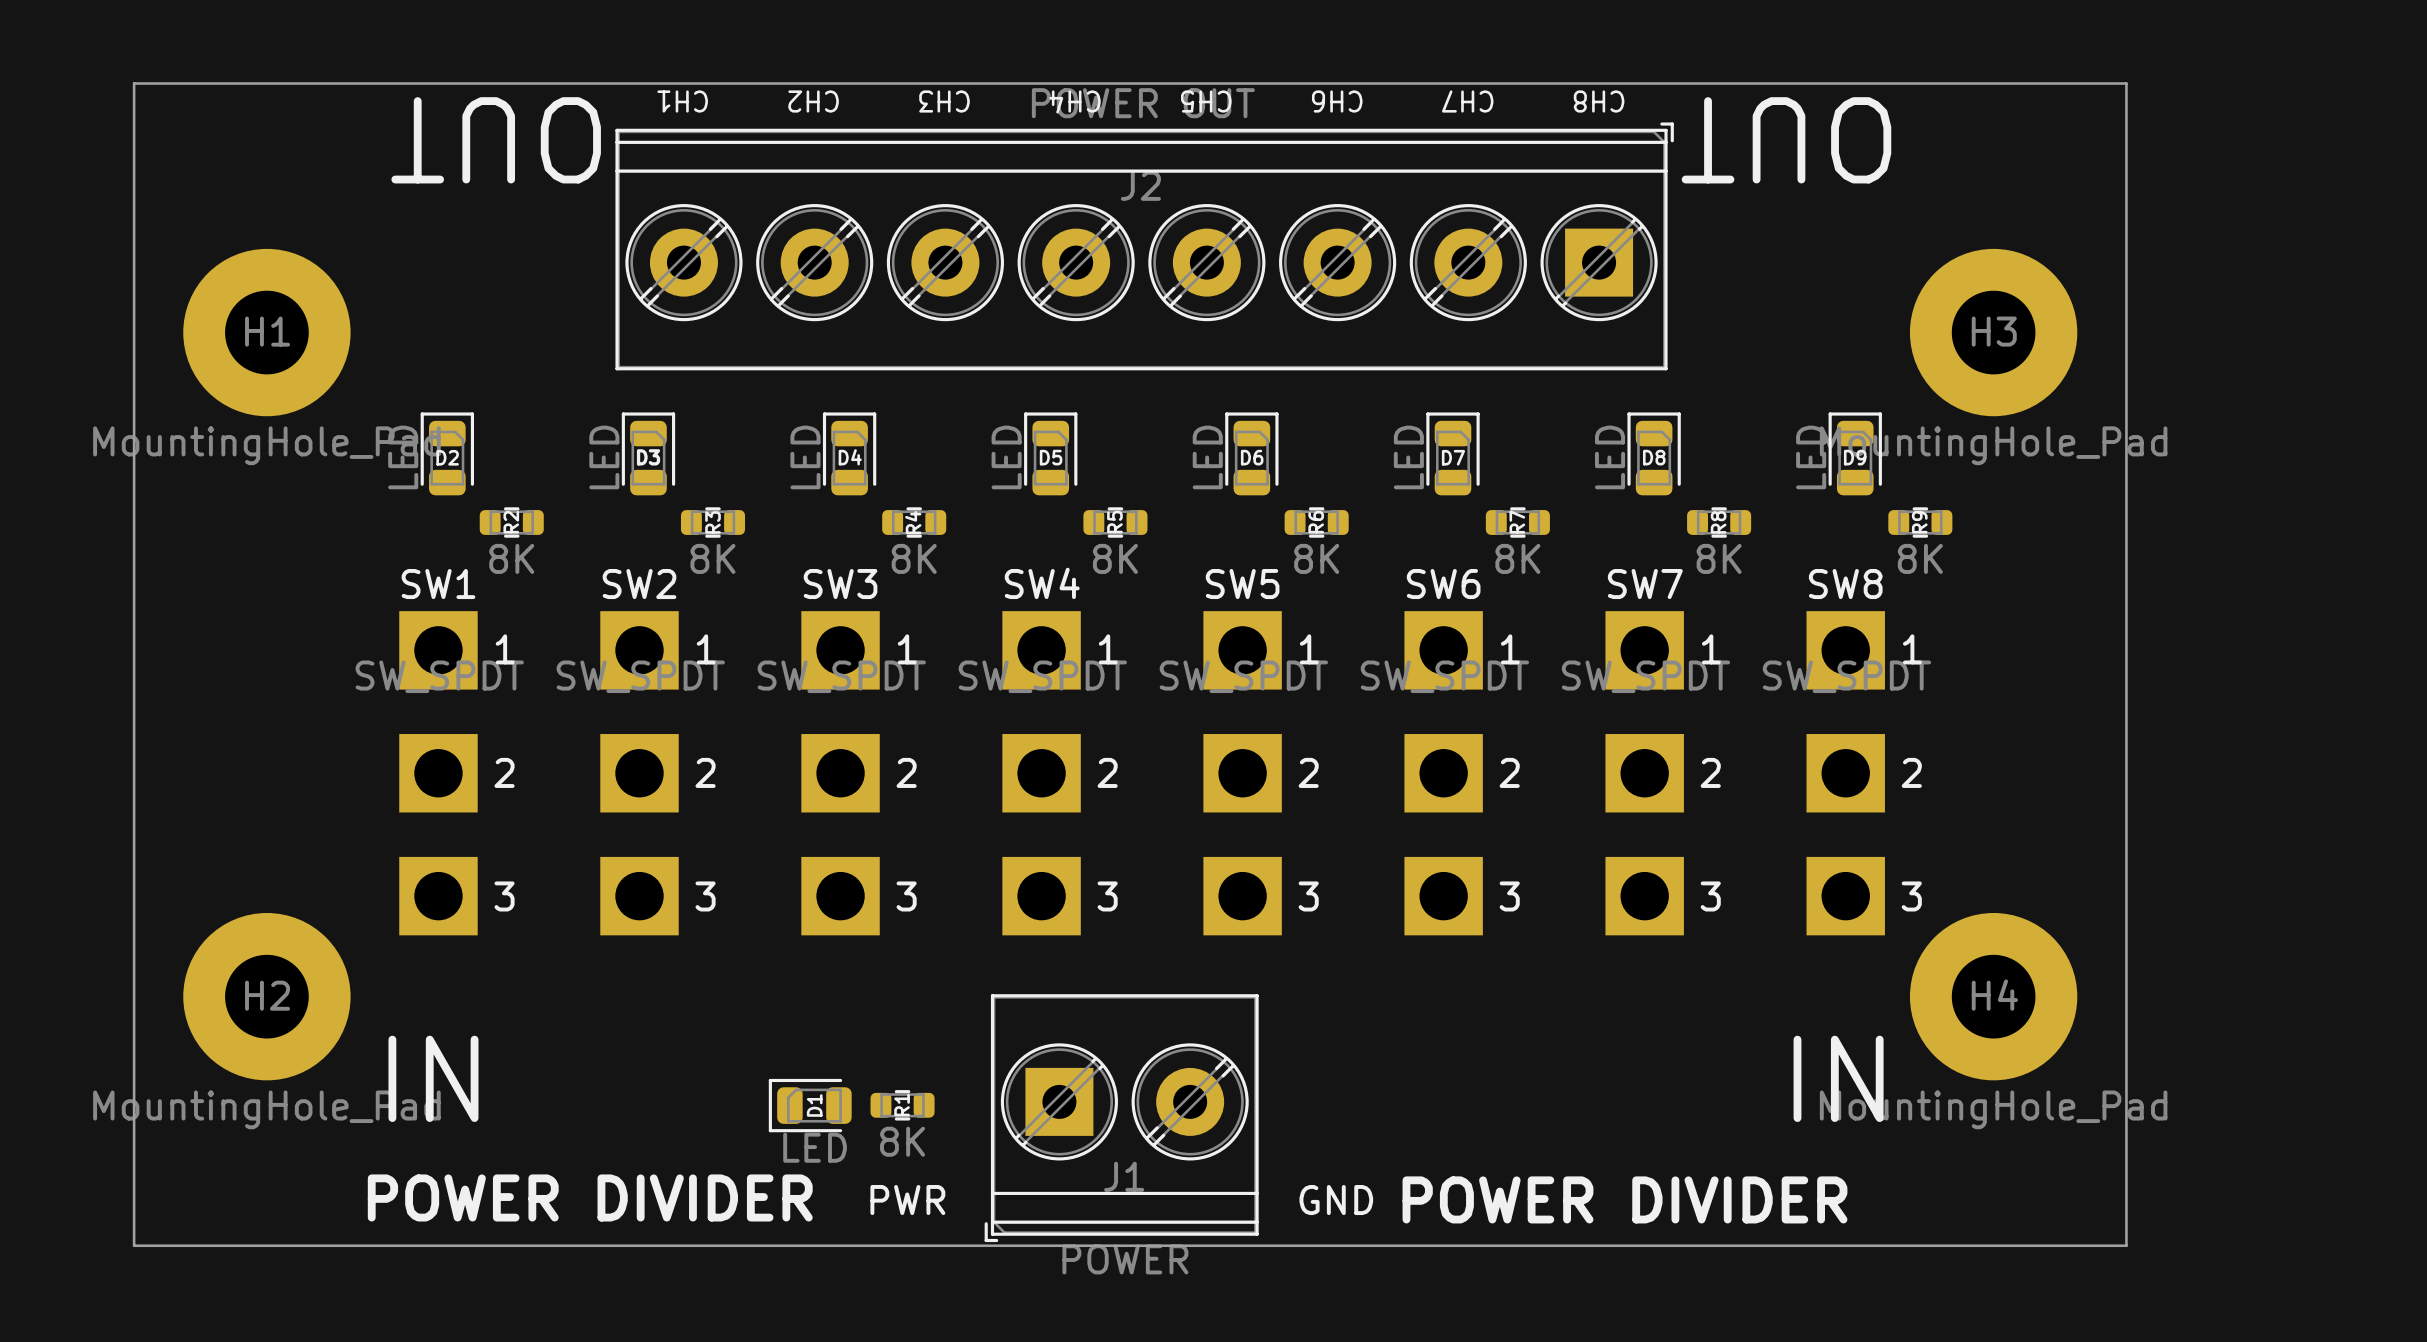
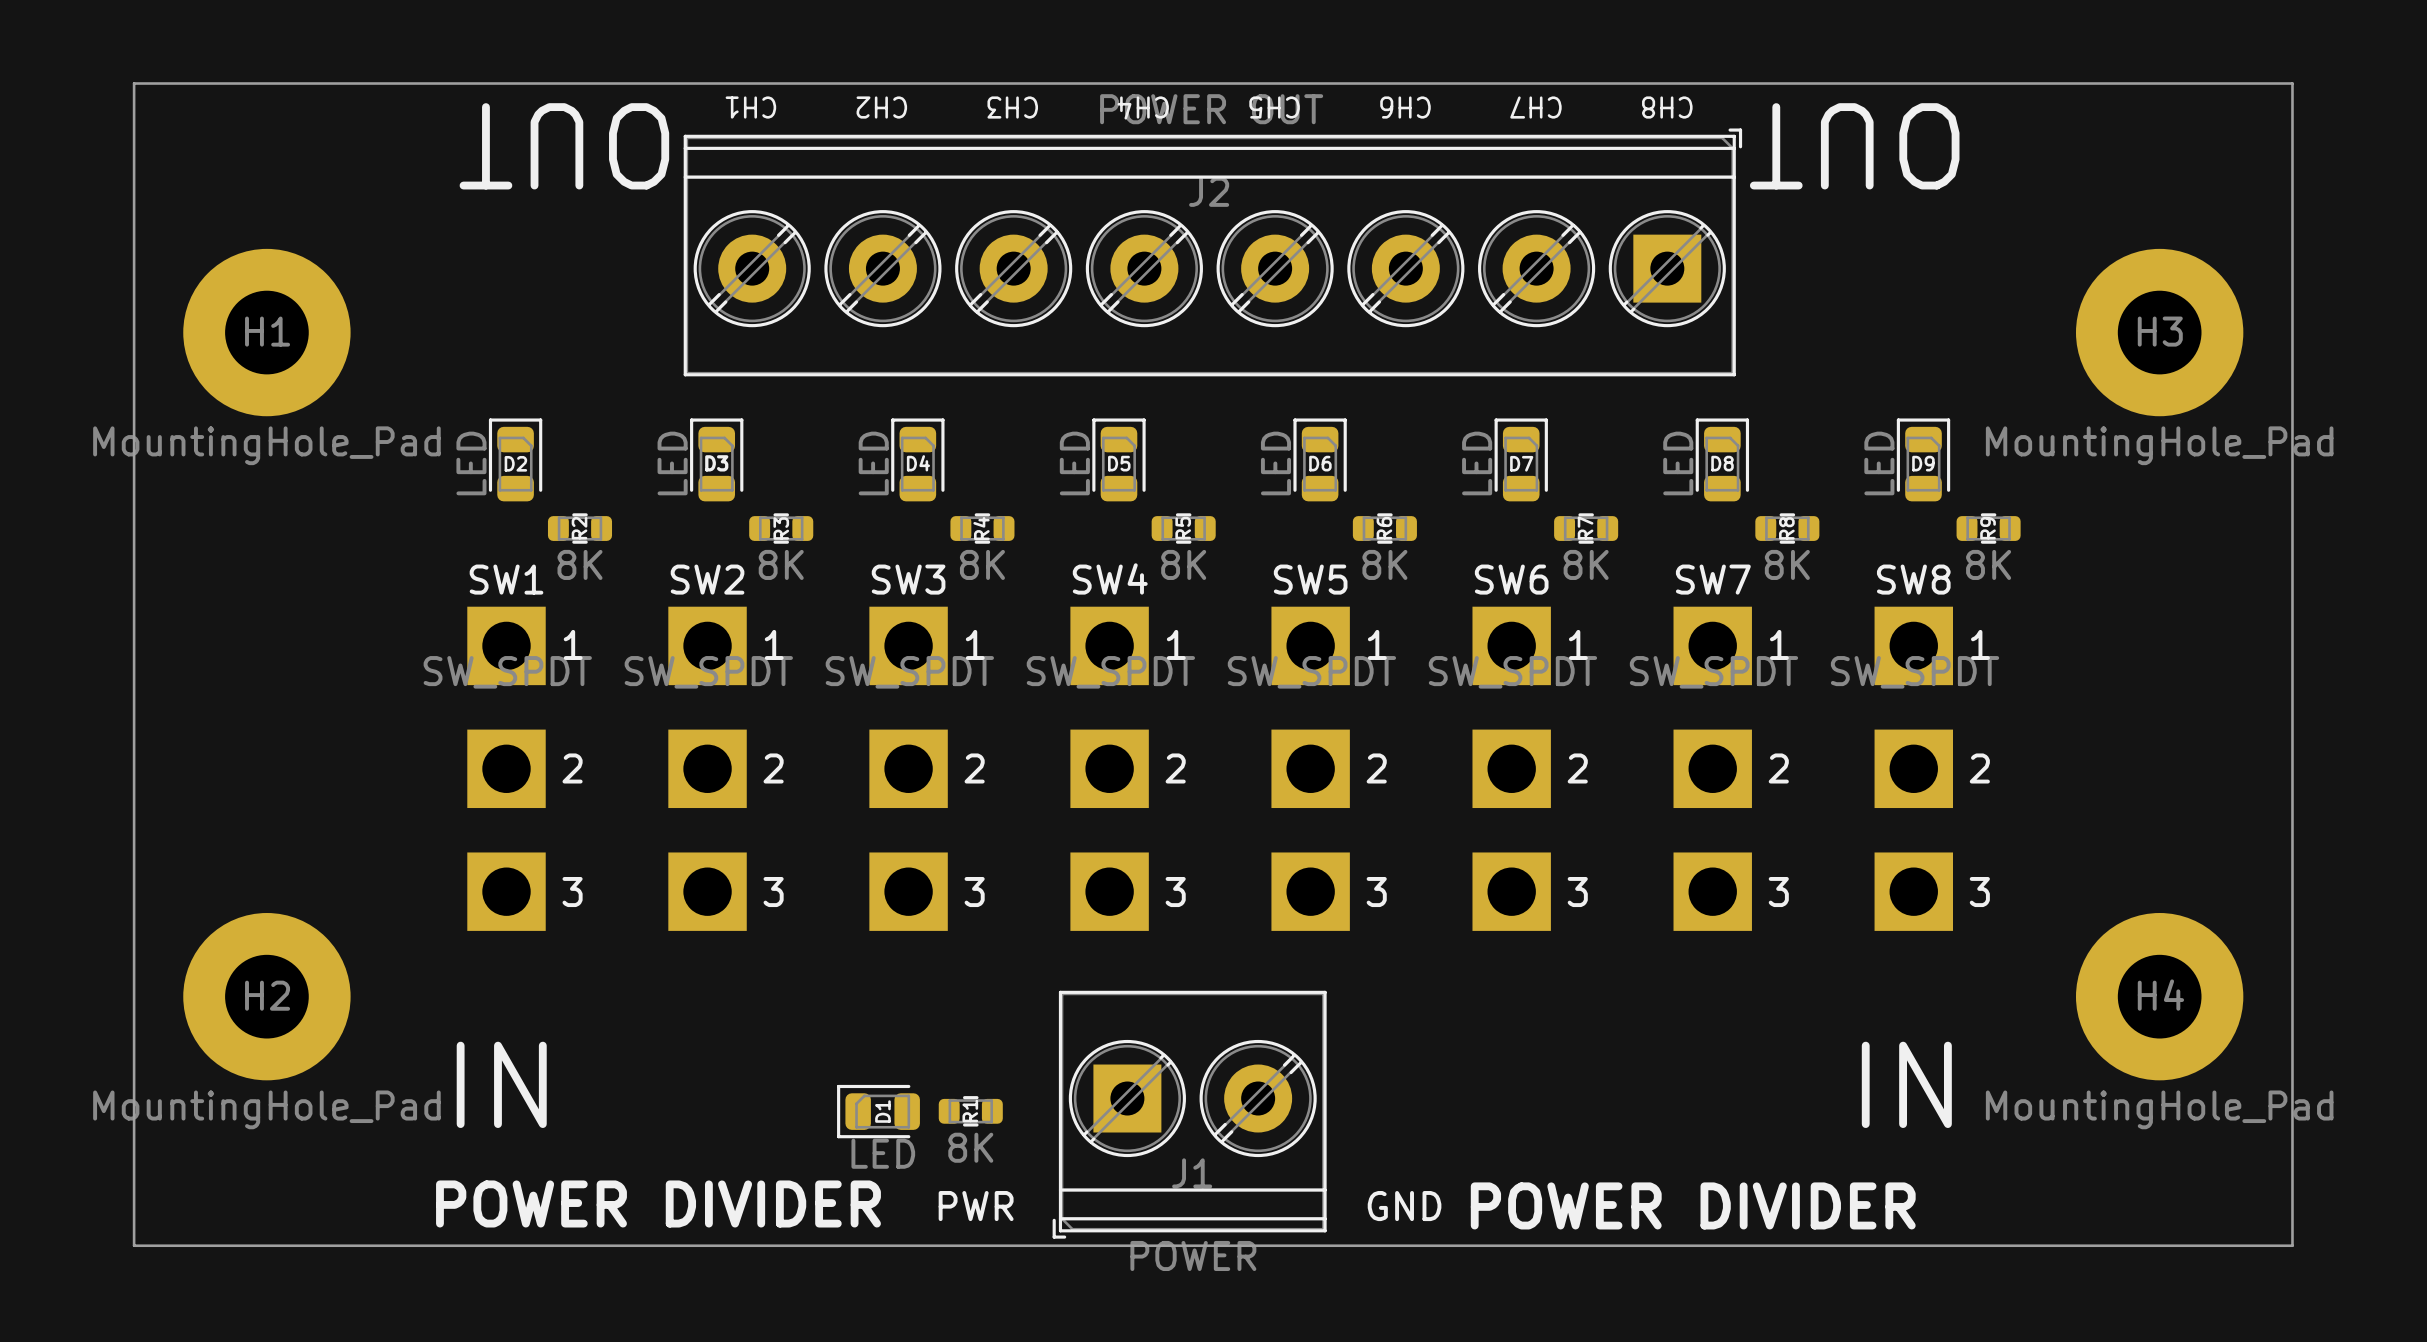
board edge: (2126, 83) (2126, 1245) -> (2126, 83) (2292, 83) (2292, 1245) (2126, 1245)
text position: CH1 (682, 101) -> CH1 (750, 107)
text position: CH2 (813, 101) -> CH2 (881, 107)
text position: CH3 (944, 101) -> CH3 (1012, 107)
text position: CH4 (1074, 101) -> CH4 (1143, 107)
text position: CH5 (1206, 101) -> CH5 (1274, 107)
text position: CH6 (1337, 101) -> CH6 (1405, 107)
text position: CH7 (1467, 101) -> CH7 (1535, 107)
text position: CH8 (1599, 101) -> CH8 (1667, 107)
text position: OUT (496, 140) -> OUT (564, 146)
text position: OUT (1786, 140) -> OUT (1854, 146)
J2 position: (1144, 246) -> (1212, 252)
H3 position: (1993, 332) -> (2159, 332)
D2 position: (447, 453) -> (515, 459)
D3 position: (648, 453) -> (716, 459)
D4 position: (849, 453) -> (917, 459)
D5 position: (1050, 453) -> (1118, 459)
D6 position: (1251, 453) -> (1320, 459)
D7 position: (1453, 453) -> (1521, 459)
D8 position: (1654, 453) -> (1722, 459)
D9 position: (1855, 453) -> (1923, 459)
R2 position: (511, 522) -> (579, 528)
R3 position: (712, 522) -> (781, 528)
R4 position: (914, 522) -> (982, 528)
R5 position: (1115, 522) -> (1183, 528)
R6 position: (1316, 522) -> (1384, 528)
R7 position: (1517, 522) -> (1586, 528)
R8 position: (1719, 522) -> (1787, 528)
R9 position: (1920, 522) -> (1988, 528)
SW1 position: (438, 773) -> (506, 768)
SW2 position: (639, 773) -> (707, 768)
SW3 position: (840, 773) -> (908, 768)
SW4 position: (1041, 773) -> (1109, 768)
SW5 position: (1242, 773) -> (1310, 768)
SW6 position: (1443, 773) -> (1511, 768)
SW7 position: (1644, 773) -> (1712, 768)
SW8 position: (1845, 773) -> (1913, 768)
H4 position: (1993, 996) -> (2159, 996)
text position: IN (433, 1078) -> IN (501, 1084)
text position: IN (1838, 1078) -> IN (1906, 1084)
D1 position: (810, 1105) -> (878, 1111)
R1 position: (902, 1105) -> (970, 1111)
J1 position: (1121, 1118) -> (1189, 1114)
text position: POWER DIVIDER (590, 1197) -> POWER DIVIDER (658, 1203)
text position: POWER DIVIDER (1624, 1199) -> POWER DIVIDER (1693, 1205)
text position: PWR (907, 1200) -> PWR (976, 1206)
text position: GND (1336, 1200) -> GND (1404, 1206)

